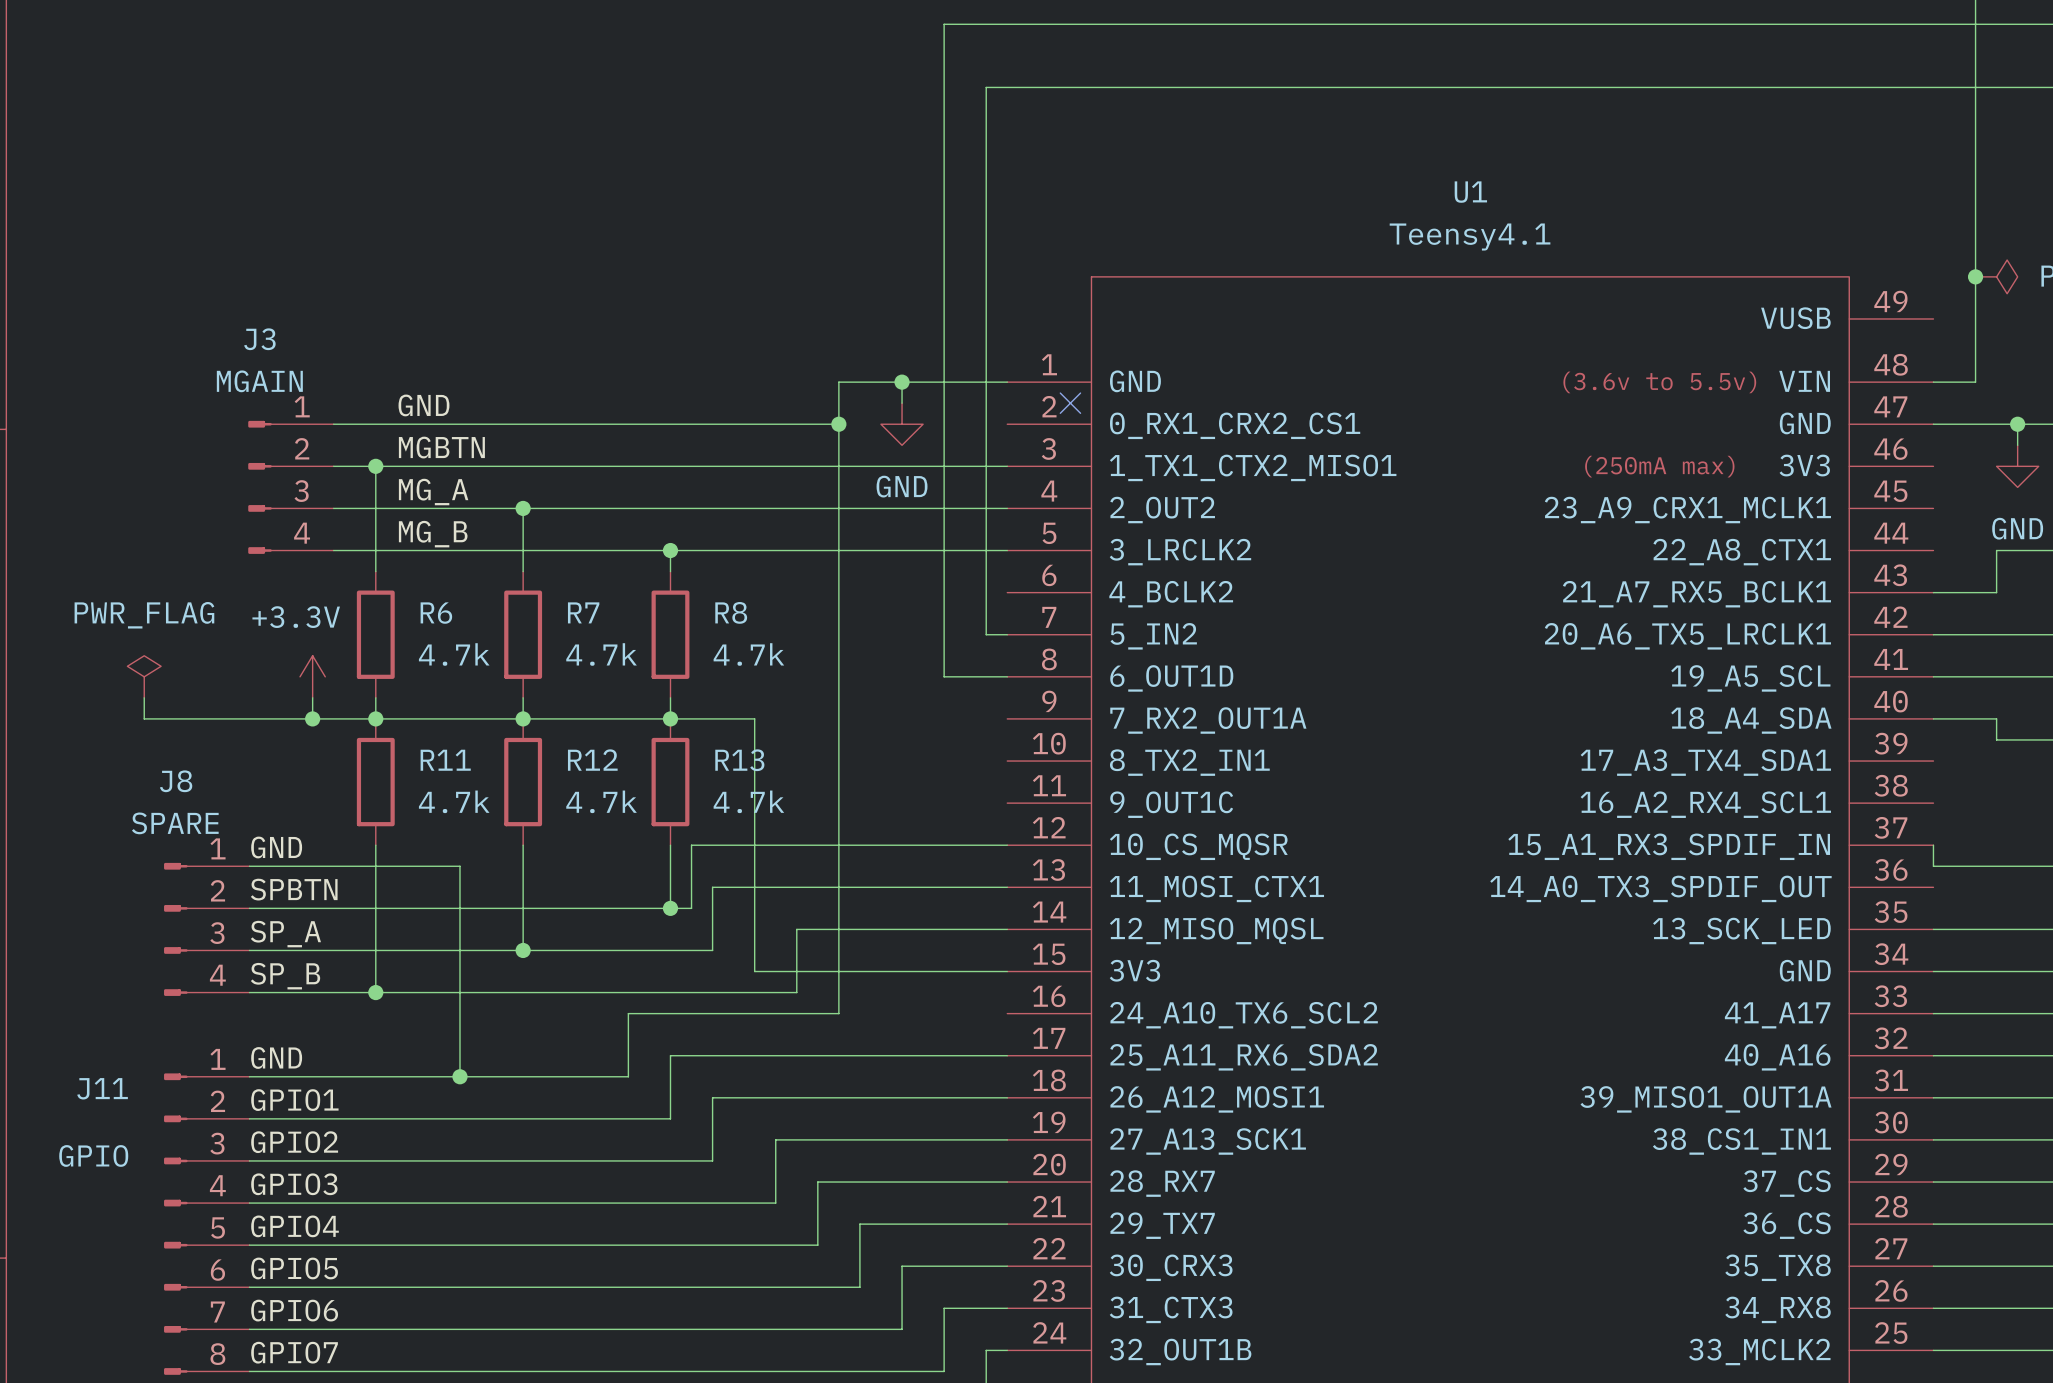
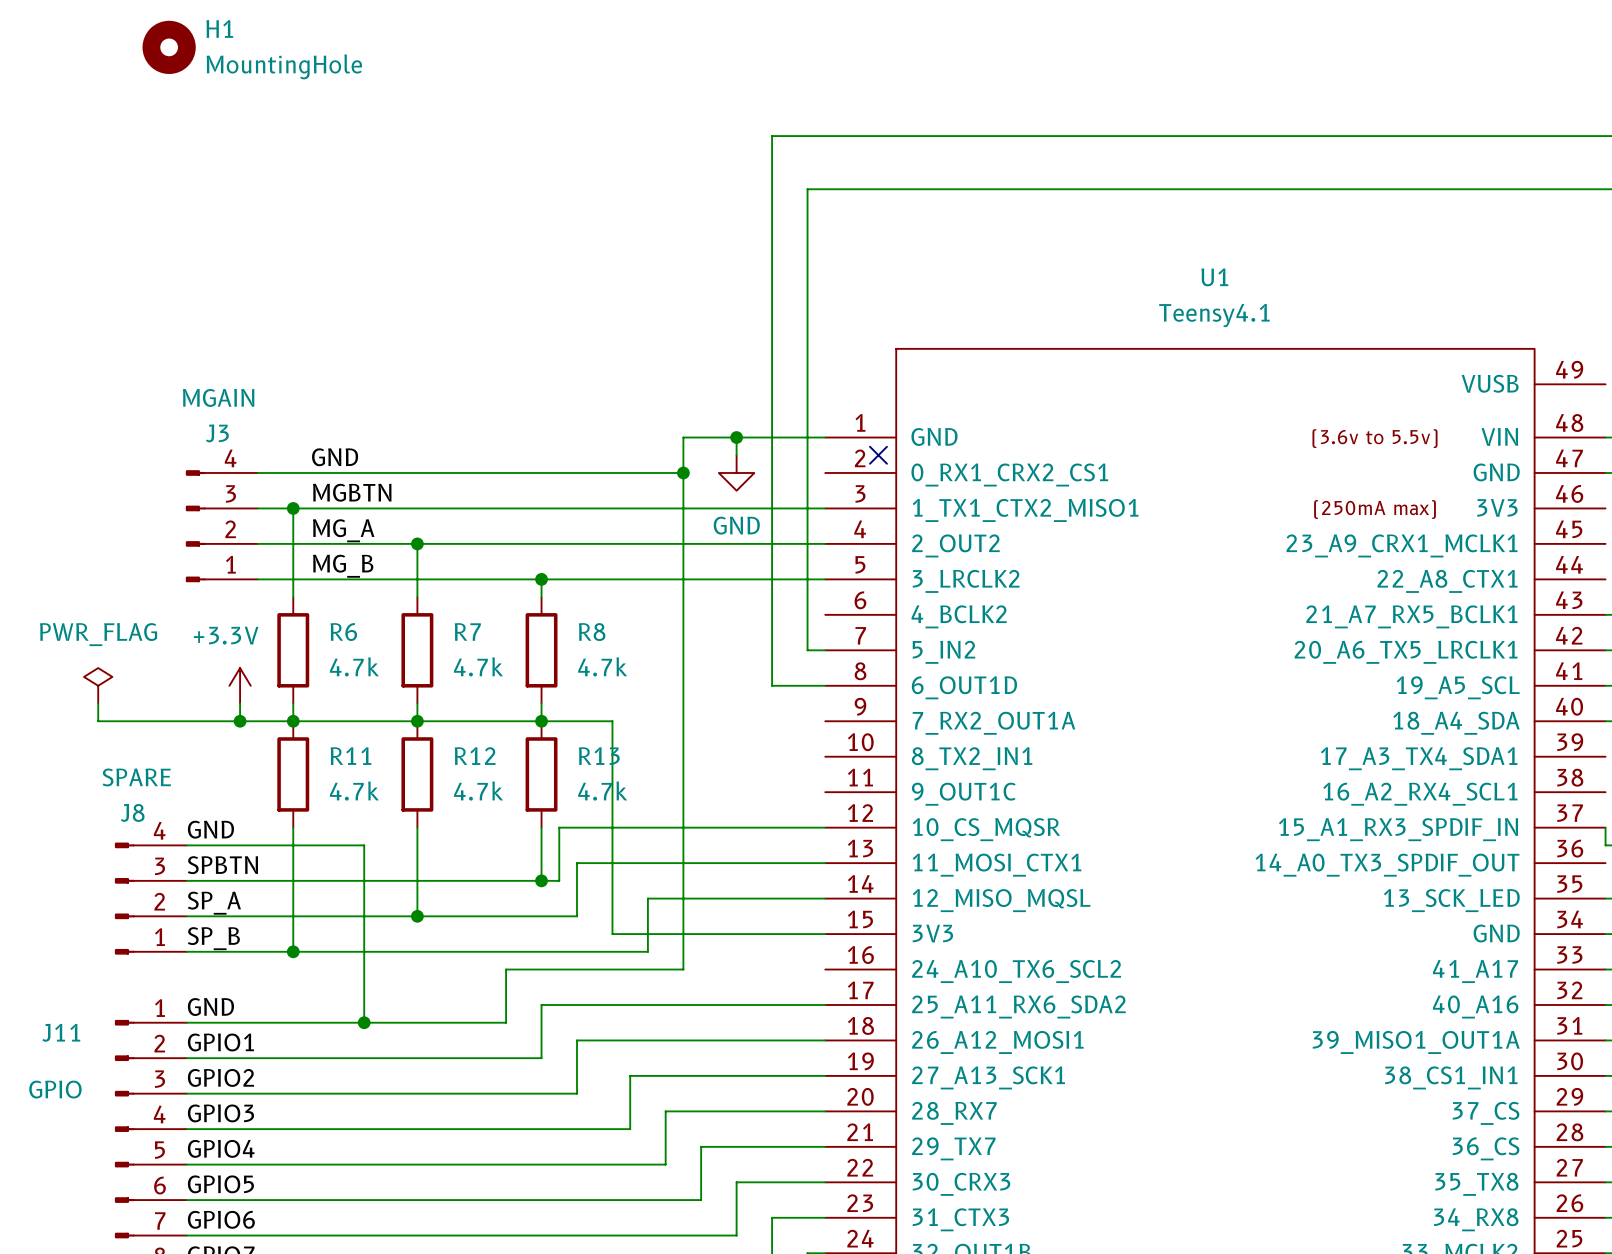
J3 name position: J3 (259, 339) -> J3 (217, 433)
J3 value position: MGAIN (259, 381) -> MGAIN (218, 397)
J3 flip: as is (260, 487) -> up-down (195, 526)
J8 name position: J8 (176, 781) -> J8 (132, 812)
J8 value position: SPARE (175, 823) -> SPARE (136, 777)
J8 flip: as is (175, 929) -> up-down (124, 898)

